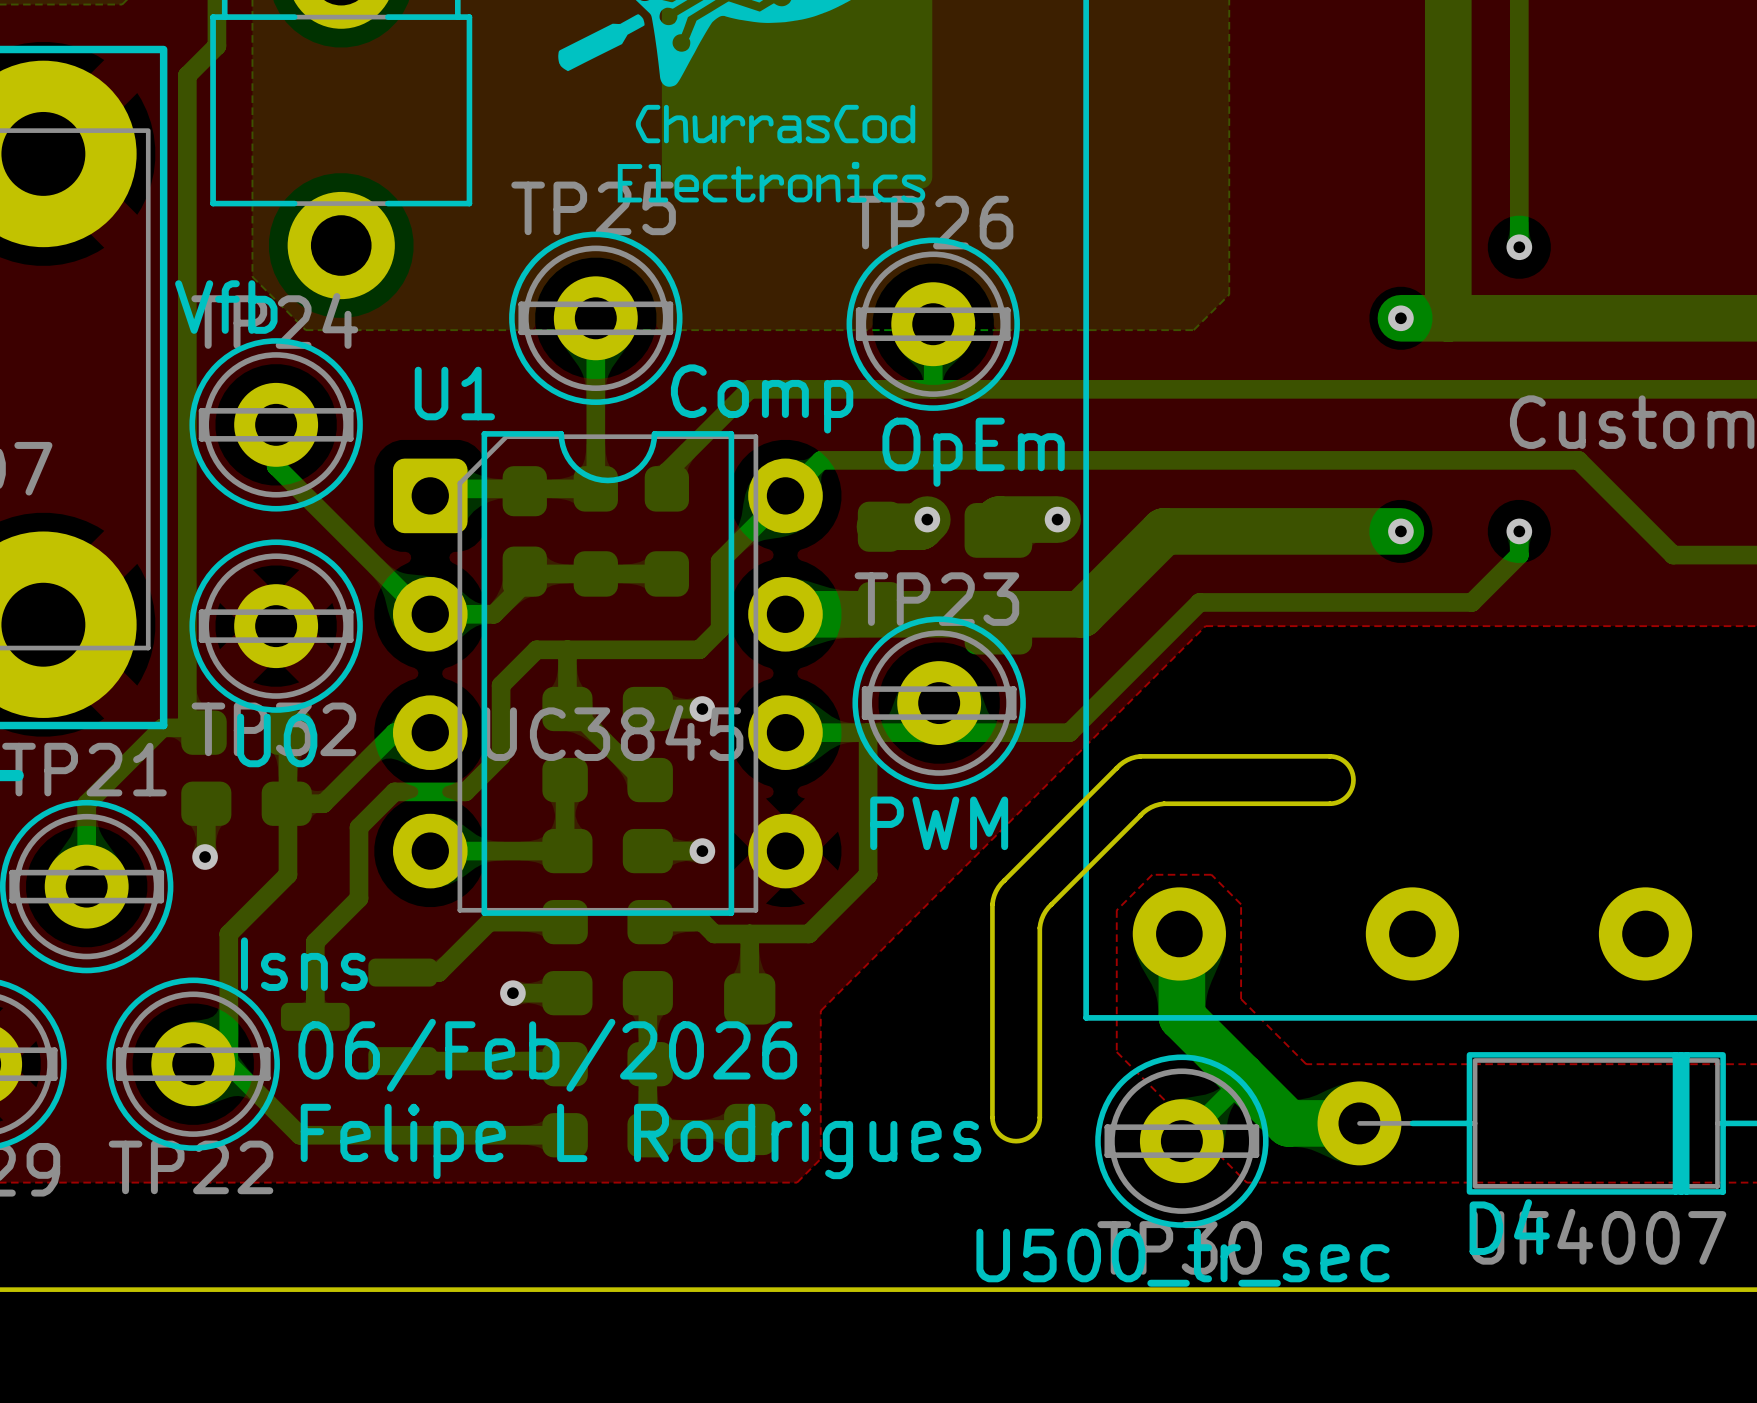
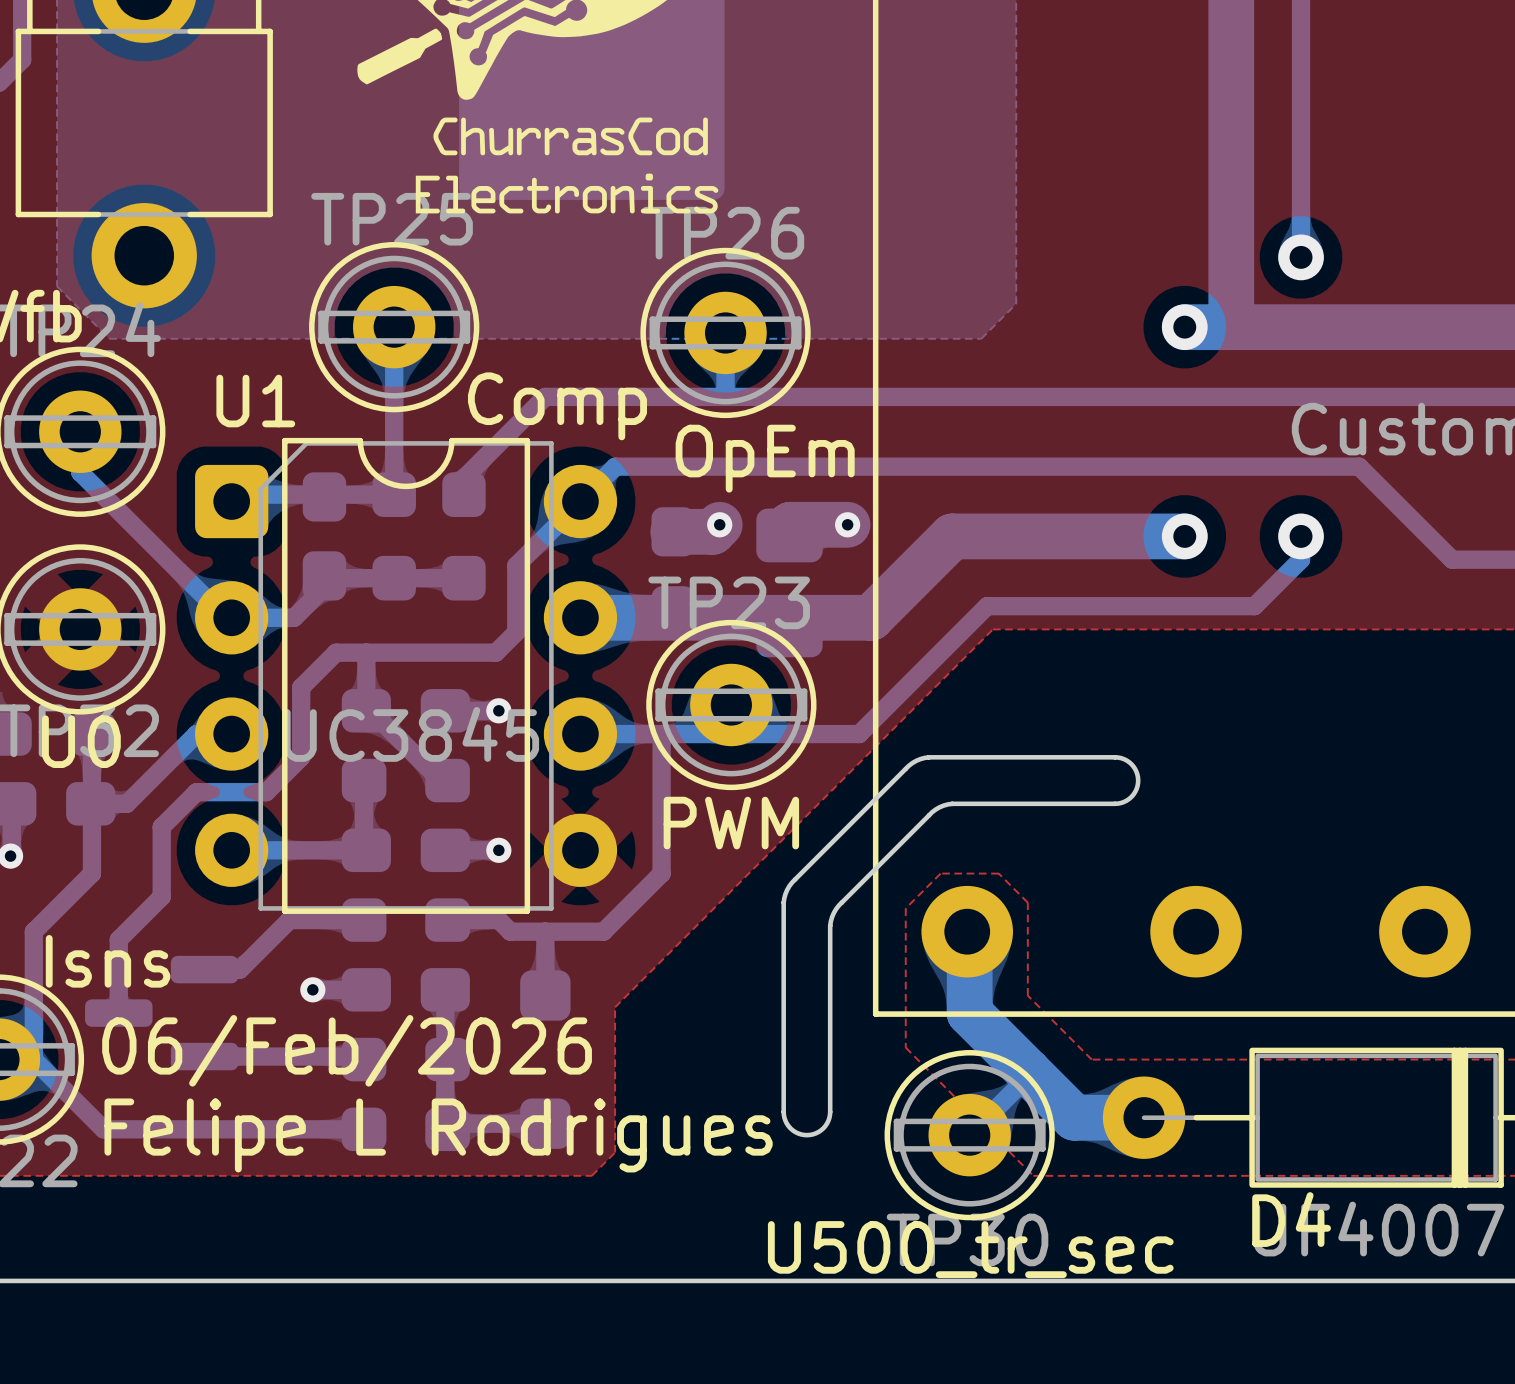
via size: [1506, 234, 1533, 261] -> [1278, 234, 1324, 281]
via size: [1388, 305, 1414, 332] -> [1161, 304, 1208, 351]
via size: [1388, 518, 1414, 545] -> [1161, 513, 1208, 560]
via size: [1506, 518, 1533, 545] -> [1278, 513, 1324, 560]

